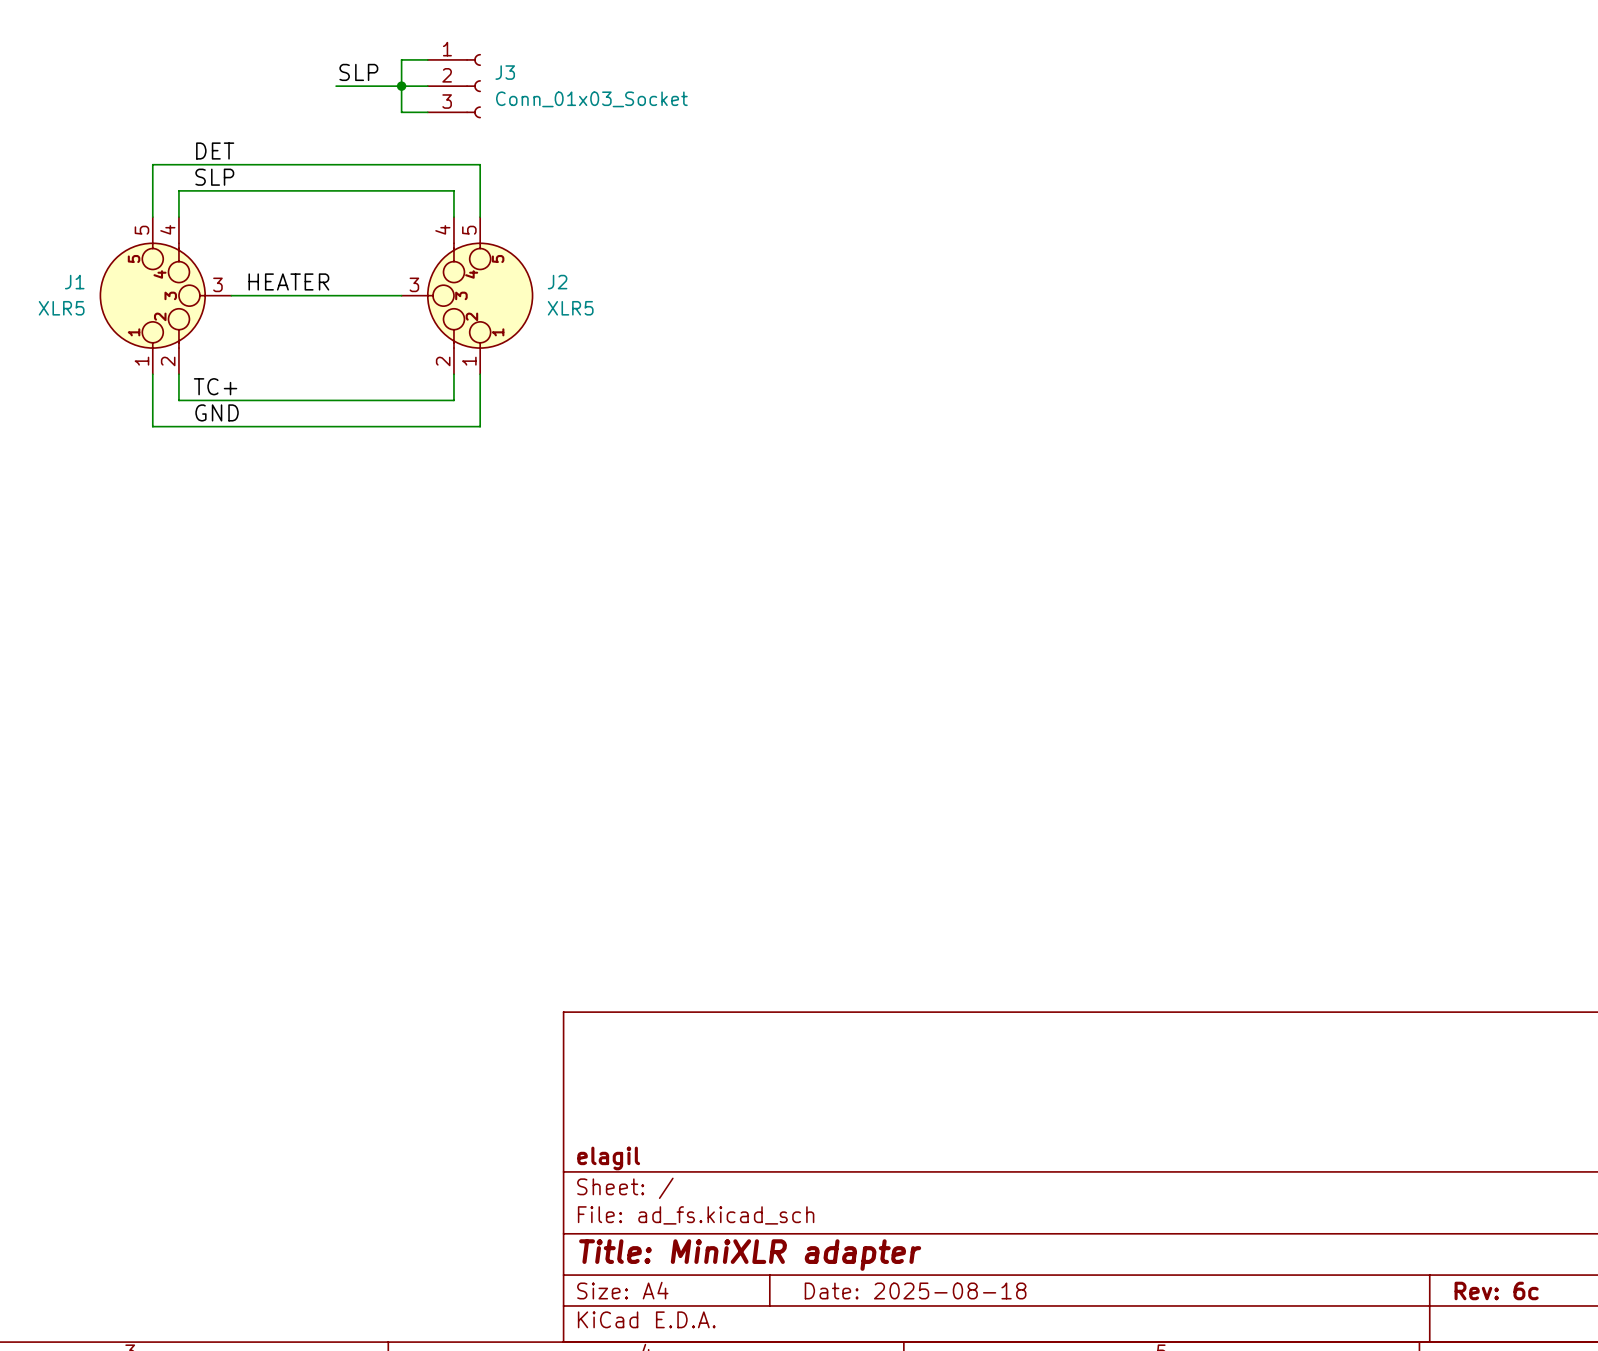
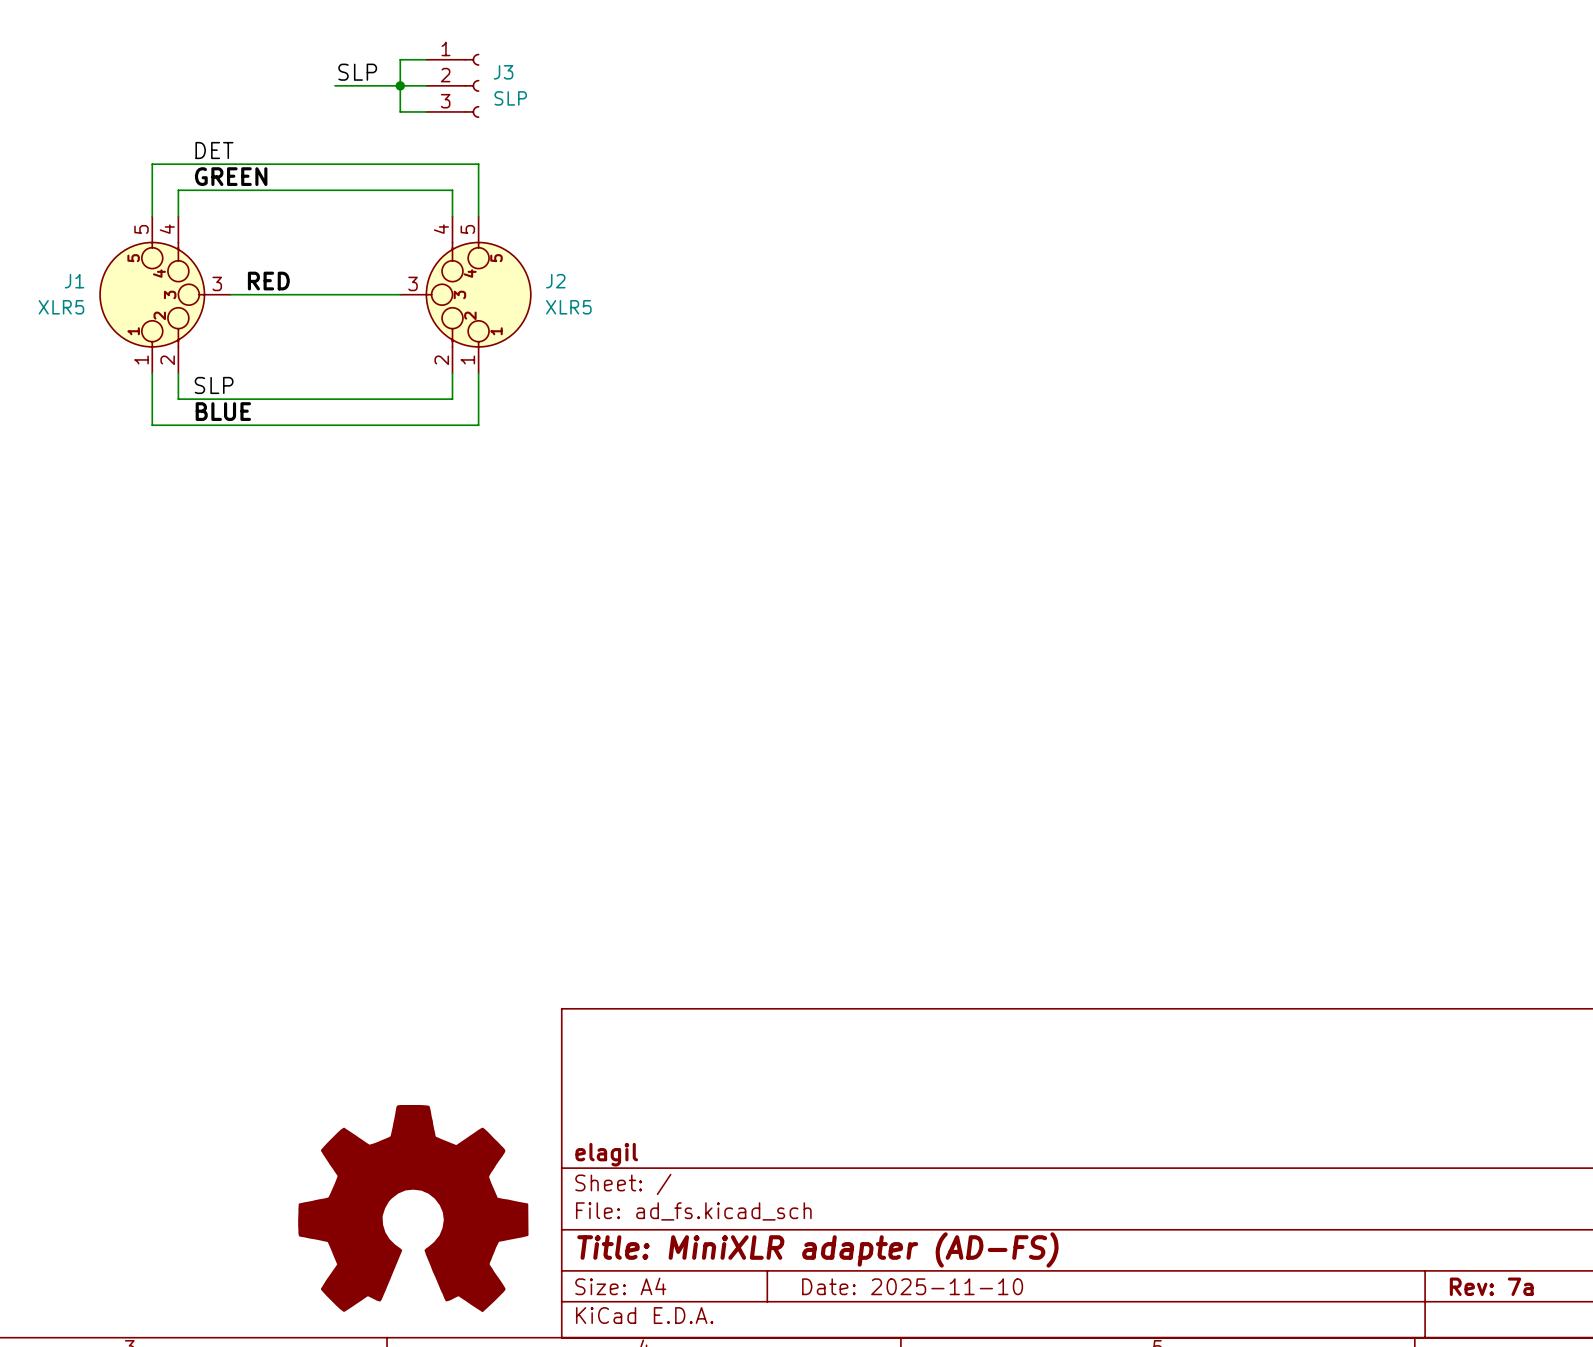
J3 value: Conn_01x03_Socket (591, 99) -> SLP (510, 98)
label: SLP (214, 177) -> GREEN (231, 176)
label: HEATER (288, 281) -> RED (268, 281)
label: TC+ (215, 386) -> SLP (214, 385)
label: GND (217, 412) -> BLUE (223, 411)
part: none -> (413, 1208)
title block: Title: MiniXLR adapter (750, 1255) -> Title: MiniXLR adapter (AD-FS) (817, 1249)
title block: Date: 2025-08-18 (915, 1290) -> Date: 2025-11-10 (912, 1286)
title block: Rev: 6c (1496, 1290) -> Rev: 7a (1491, 1286)

